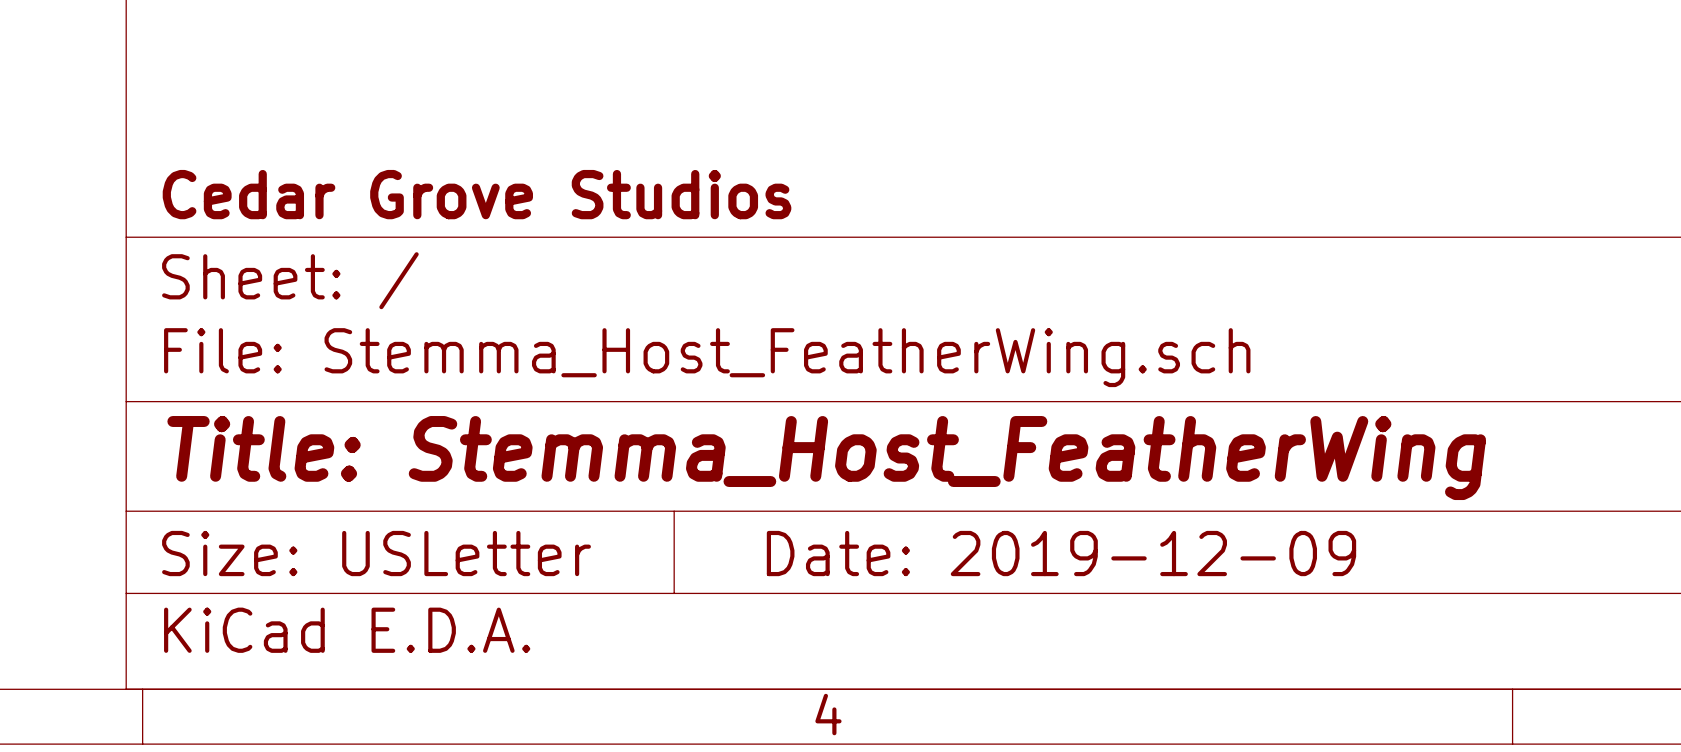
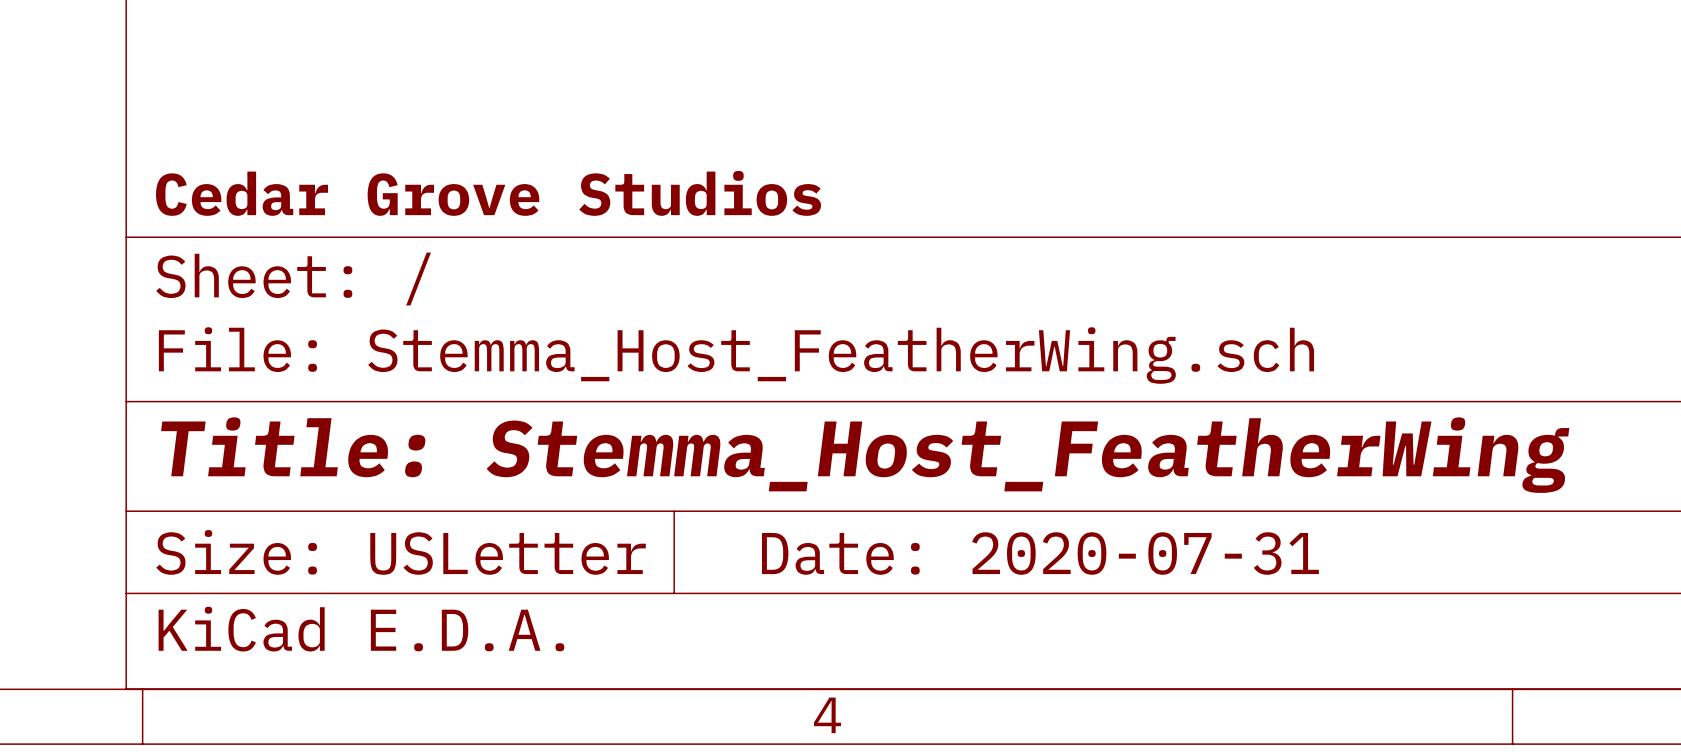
title block: Date: 2019-12-09 (1061, 553) -> Date: 2020-07-31 (1040, 553)

